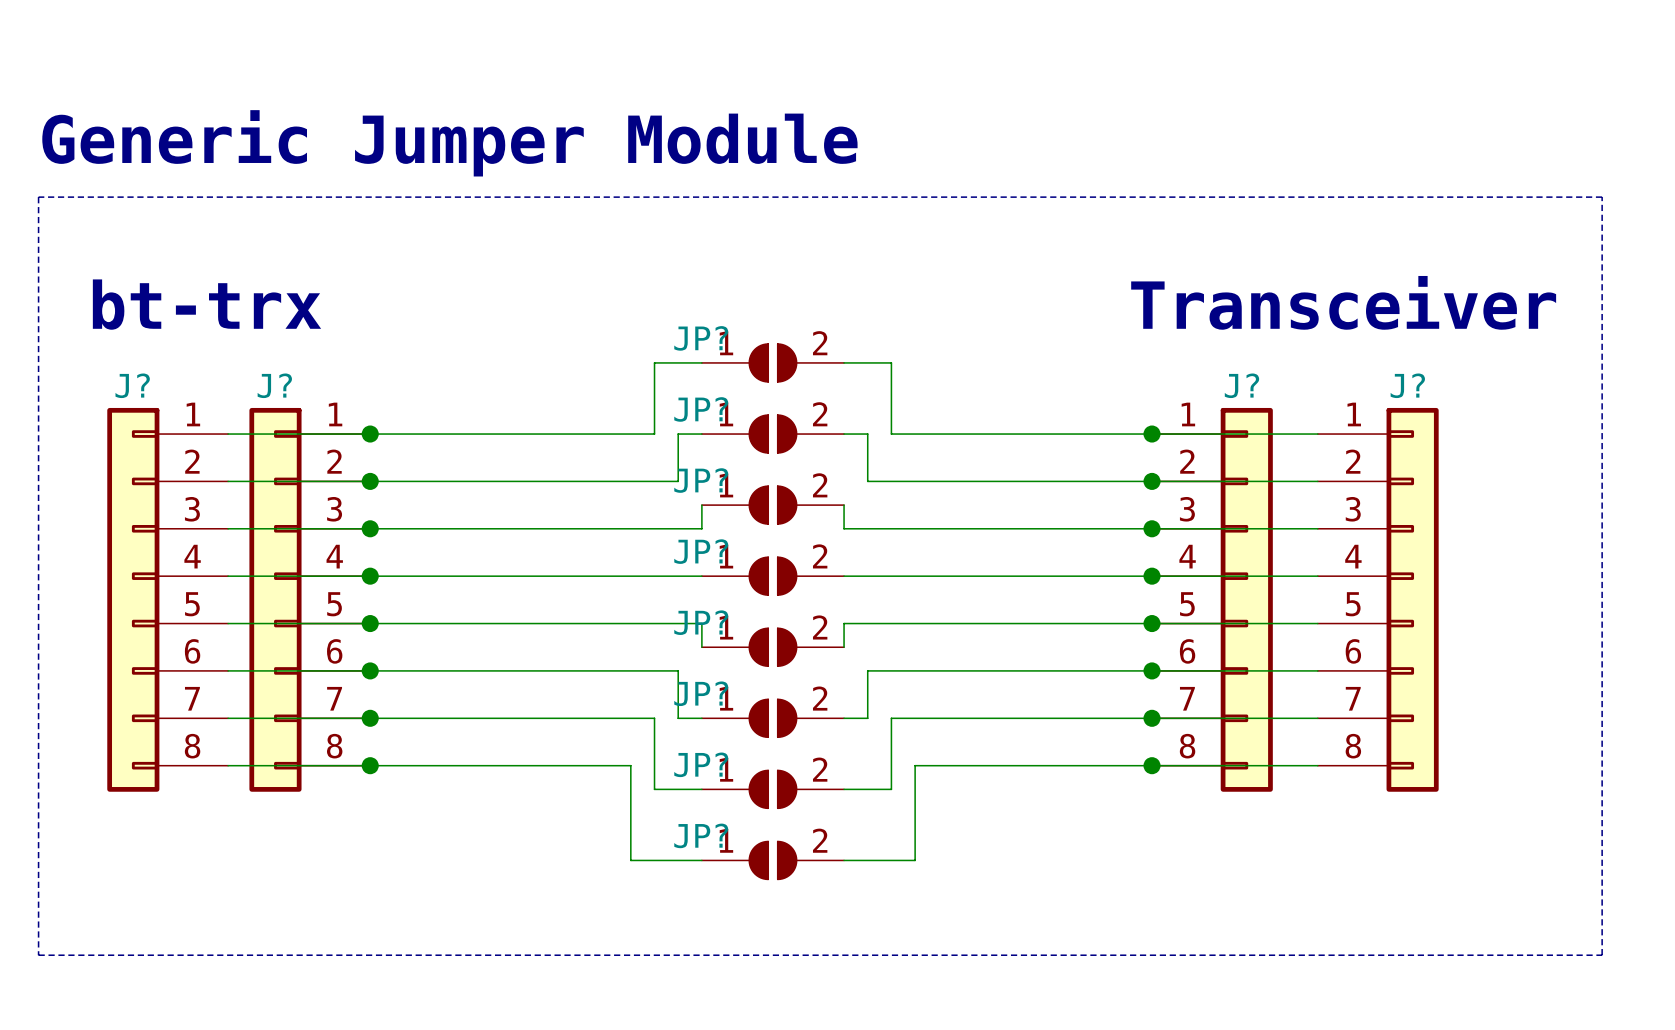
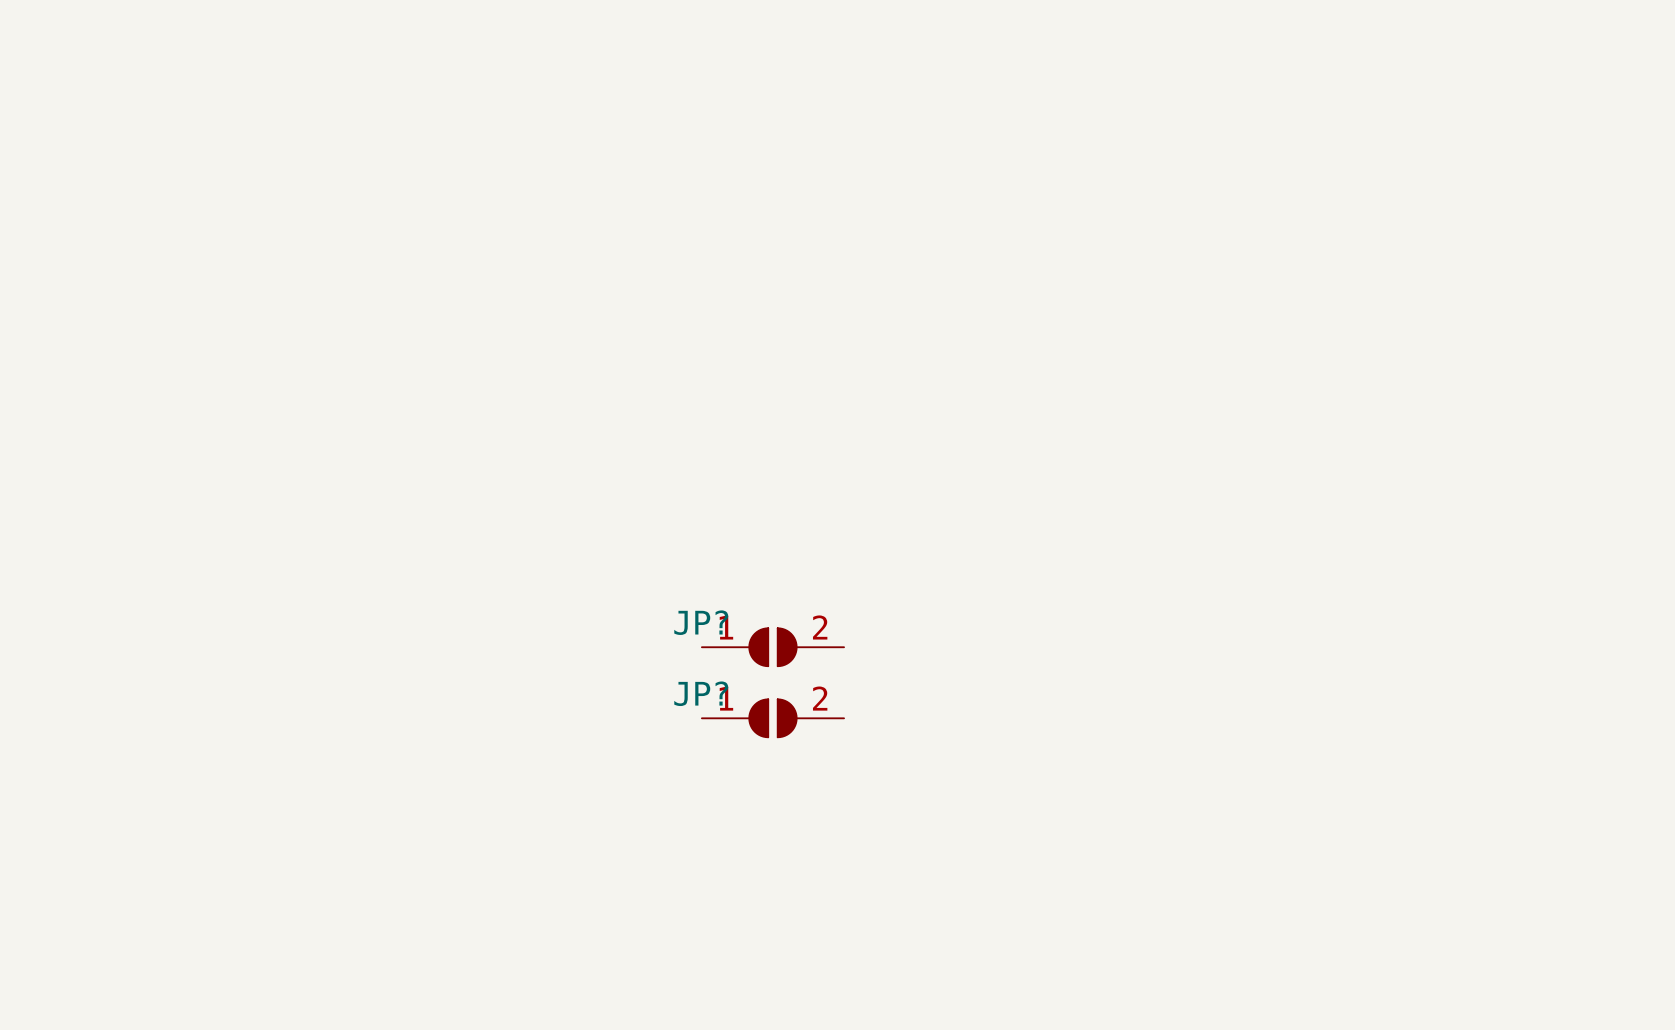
text: Generic Jumper Module (449, 143) -> none
line: (38, 197) (38, 955) (1602, 955) (1602, 197) (38, 197) -> none
text: Transceiver (1343, 302) -> none
text: bt-trx (206, 304) -> none
wire: (701, 362) (654, 362) (654, 434) (228, 434) -> none
JP?: (772, 362) -> none
wire: (844, 362) (891, 362) (891, 434) (1317, 434) -> none
junction: (370, 434) -> none
wire: (701, 434) (678, 434) (678, 481) (228, 481) -> none
JP?: (772, 434) -> none
wire: (844, 434) (867, 434) (867, 481) (1317, 481) -> none
junction: (1152, 434) -> none
junction: (370, 481) -> none
junction: (1152, 481) -> none
wire: (701, 505) (701, 528) (228, 528) -> none
JP?: (772, 505) -> none
wire: (844, 505) (844, 528) (1317, 528) -> none
junction: (370, 528) -> none
junction: (1152, 528) -> none
wire: (228, 576) (701, 576) -> none
junction: (370, 576) -> none
JP?: (772, 576) -> none
wire: (844, 576) (1317, 576) -> none
junction: (1152, 576) -> none
J?: (167, 599) -> none
J?: (309, 599) -> none
J?: (1212, 599) -> none
J?: (1378, 599) -> none
wire: (228, 623) (701, 623) (701, 647) -> none
junction: (370, 623) -> none
junction: (1152, 623) -> none
wire: (1317, 623) (844, 623) (844, 647) -> none
wire: (228, 670) (678, 670) (678, 718) (701, 718) -> none
junction: (370, 670) -> none
junction: (1152, 670) -> none
wire: (1317, 670) (867, 670) (867, 718) (844, 718) -> none
wire: (228, 718) (654, 718) (654, 789) (701, 789) -> none
junction: (370, 718) -> none
junction: (1152, 718) -> none
wire: (1317, 718) (891, 718) (891, 789) (844, 789) -> none
wire: (228, 765) (630, 765) (630, 860) (701, 860) -> none
junction: (370, 765) -> none
junction: (1152, 765) -> none
wire: (1317, 765) (915, 765) (915, 860) (844, 860) -> none
JP?: (772, 789) -> none
JP?: (772, 860) -> none

